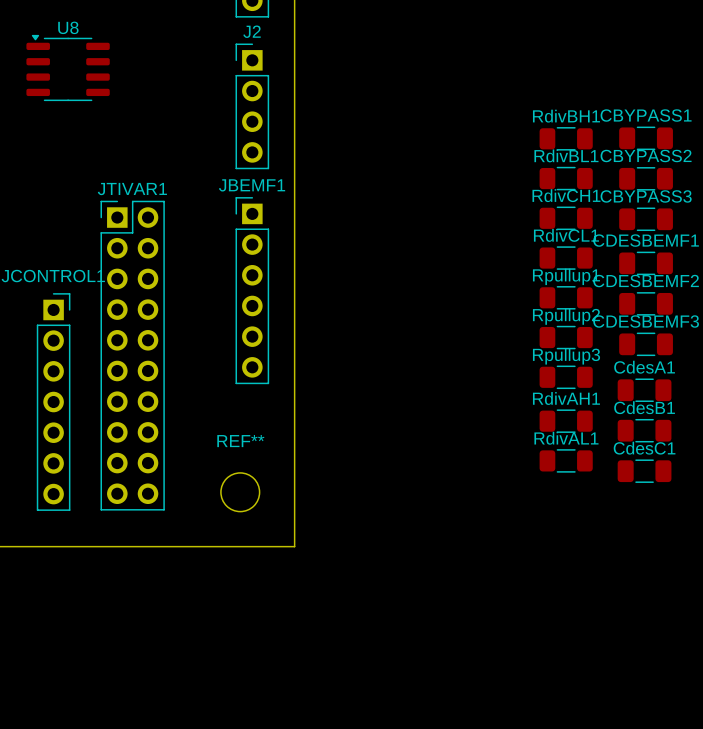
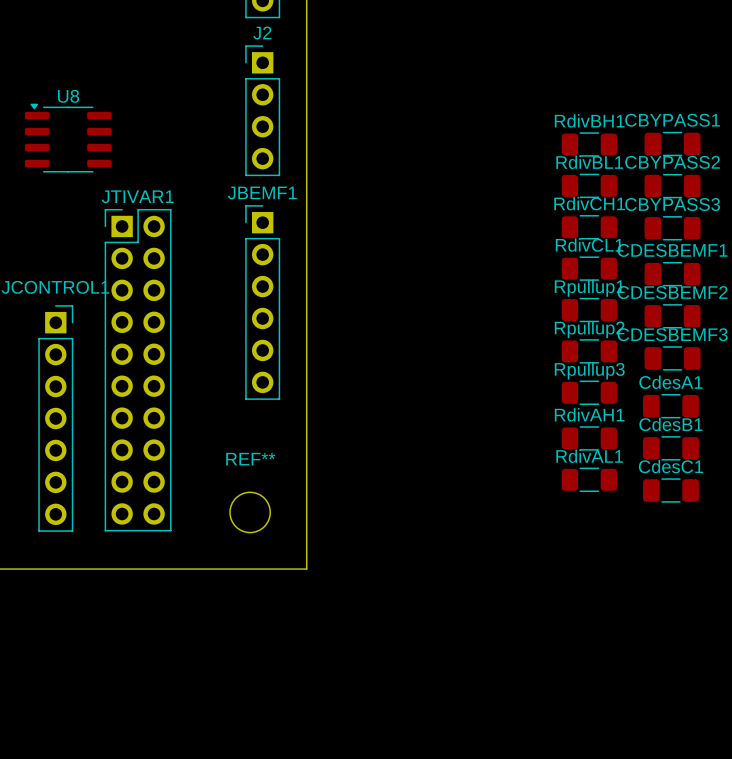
U8 position: (68, 67) -> (68, 138)

